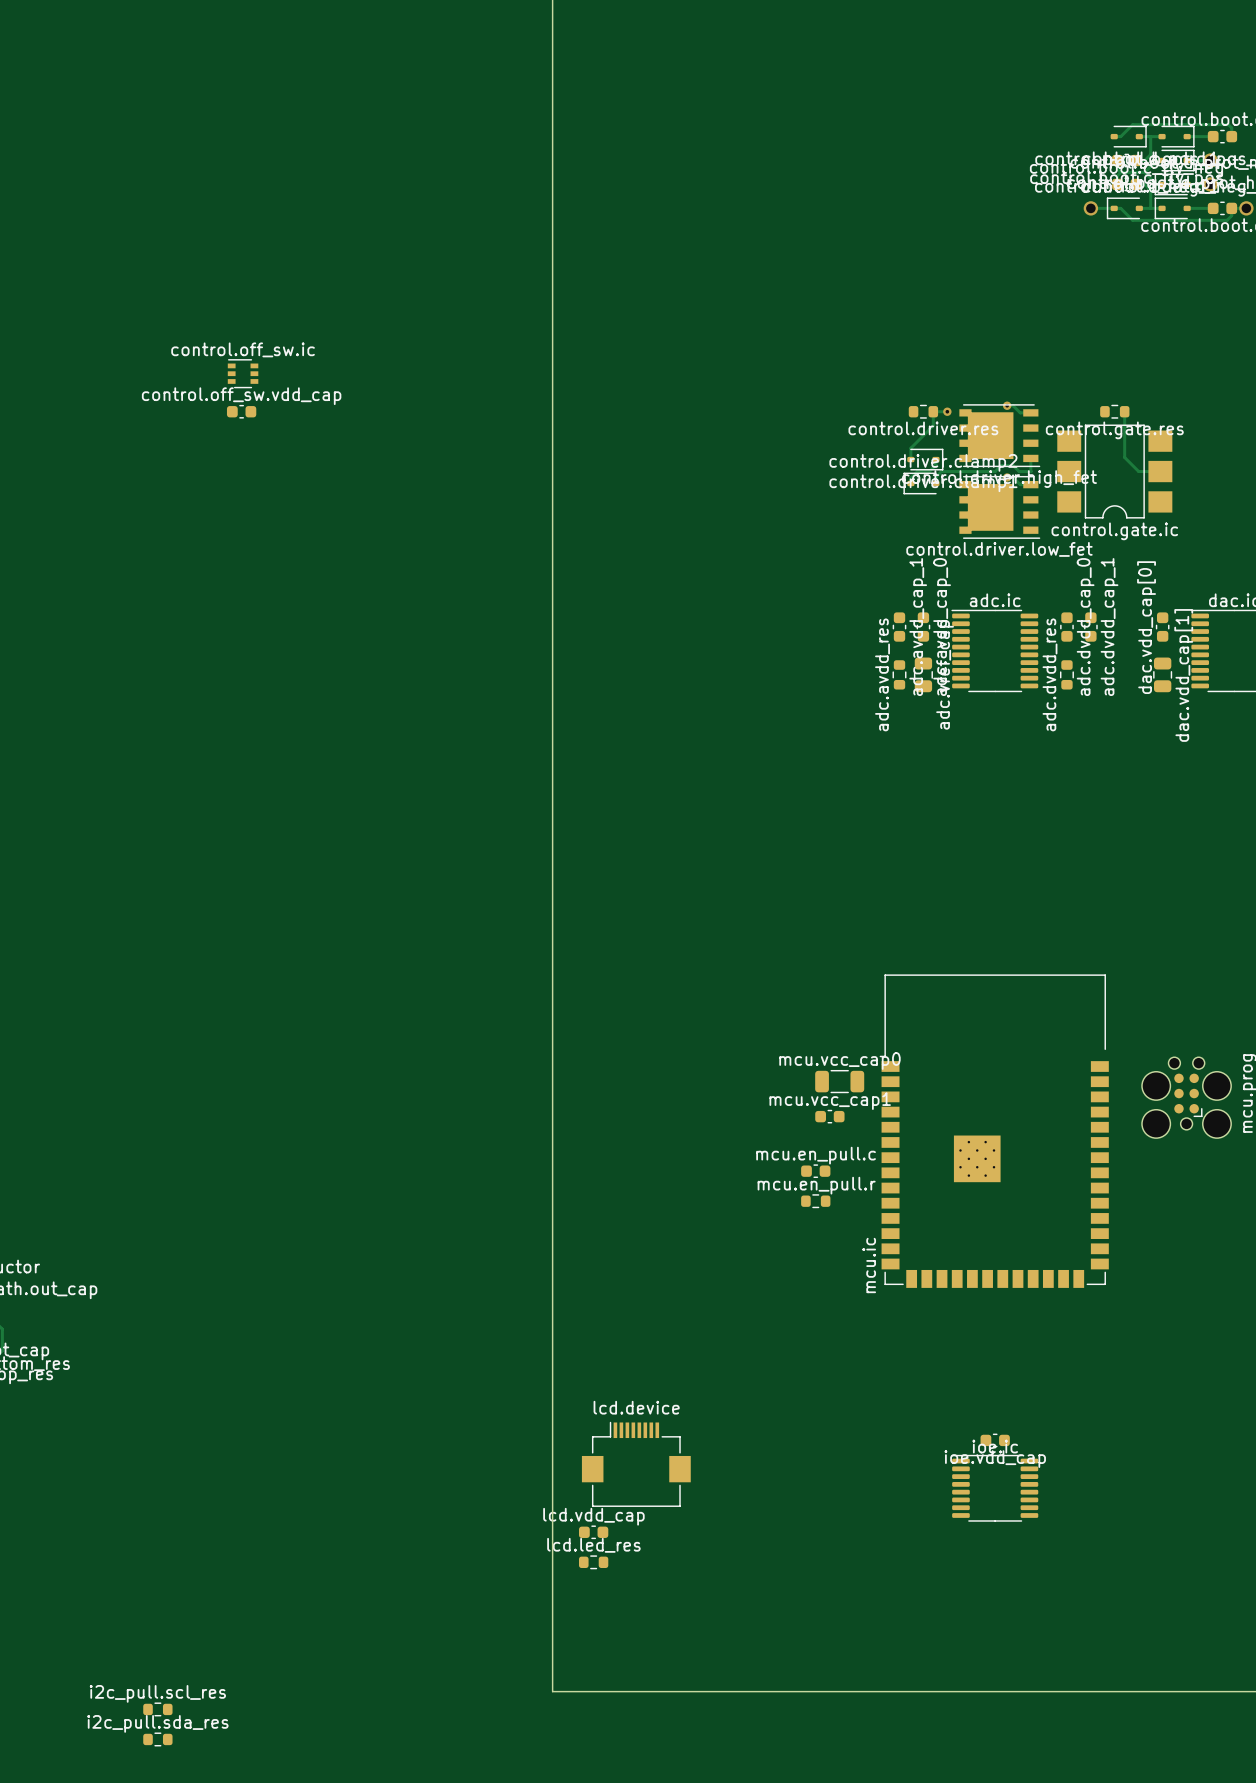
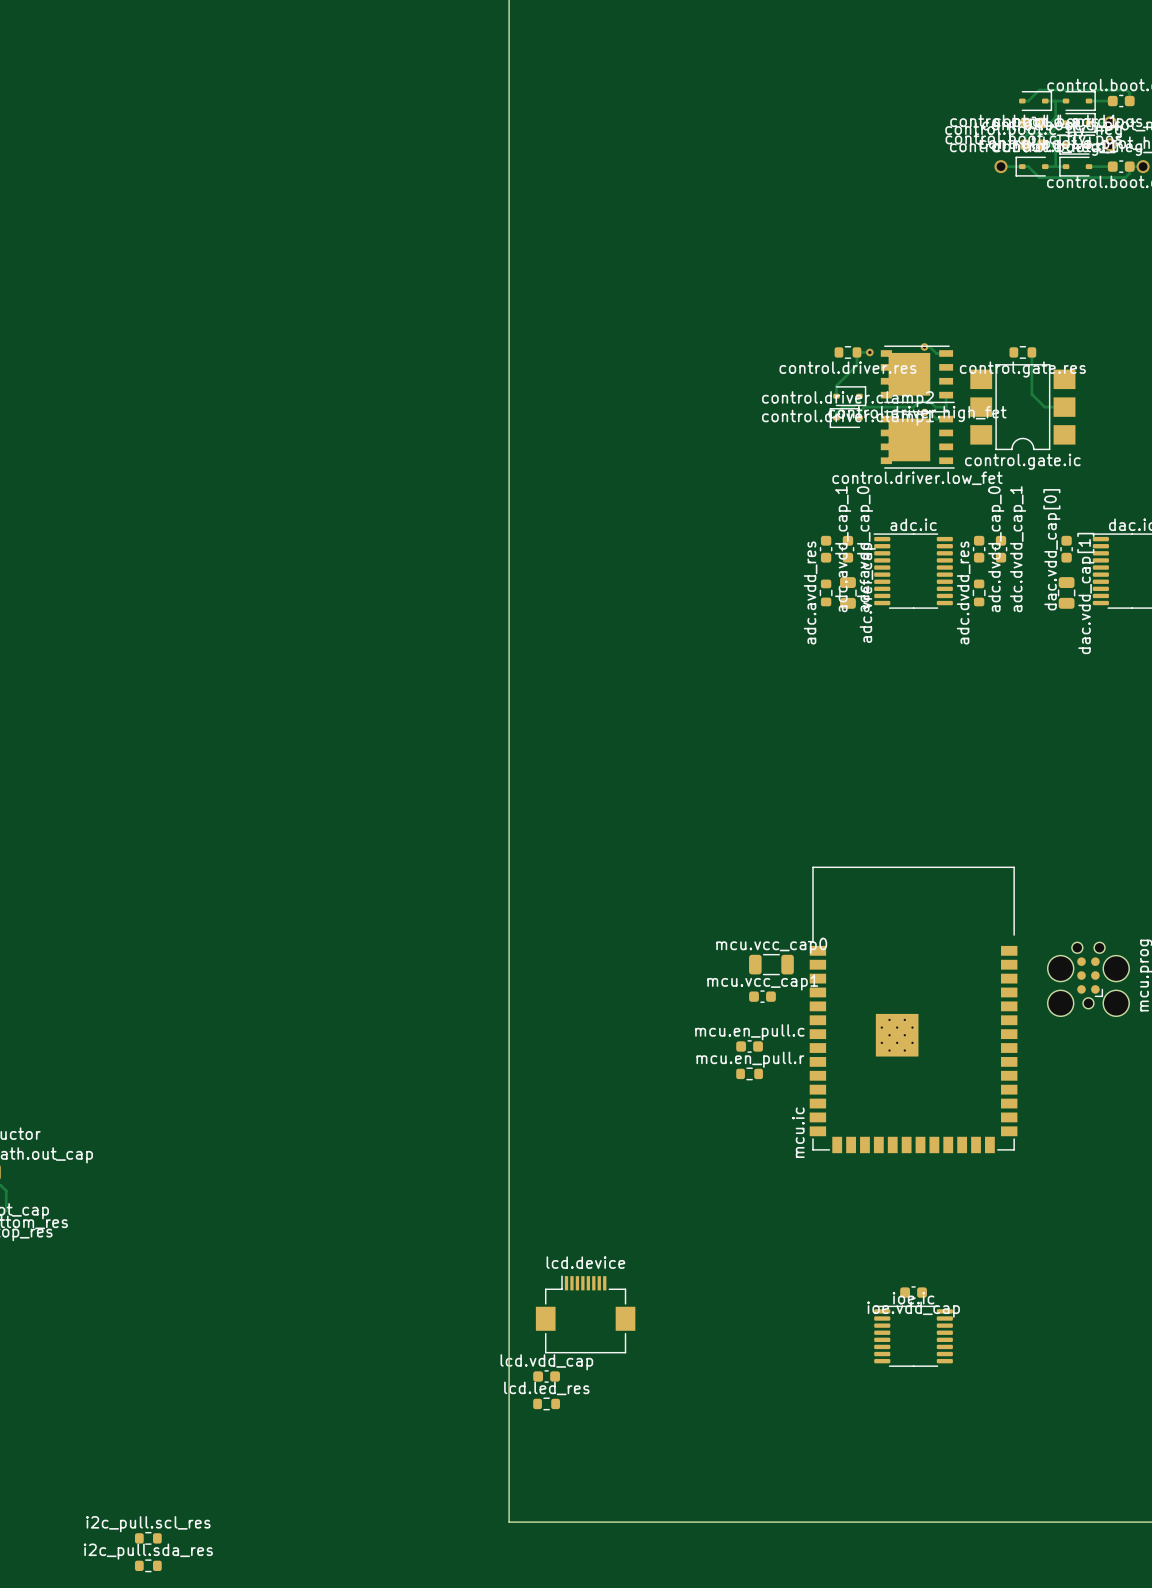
control.off_sw.ic: (243, 373) -> none
control.off_sw.vdd_cap: (241, 411) -> none

